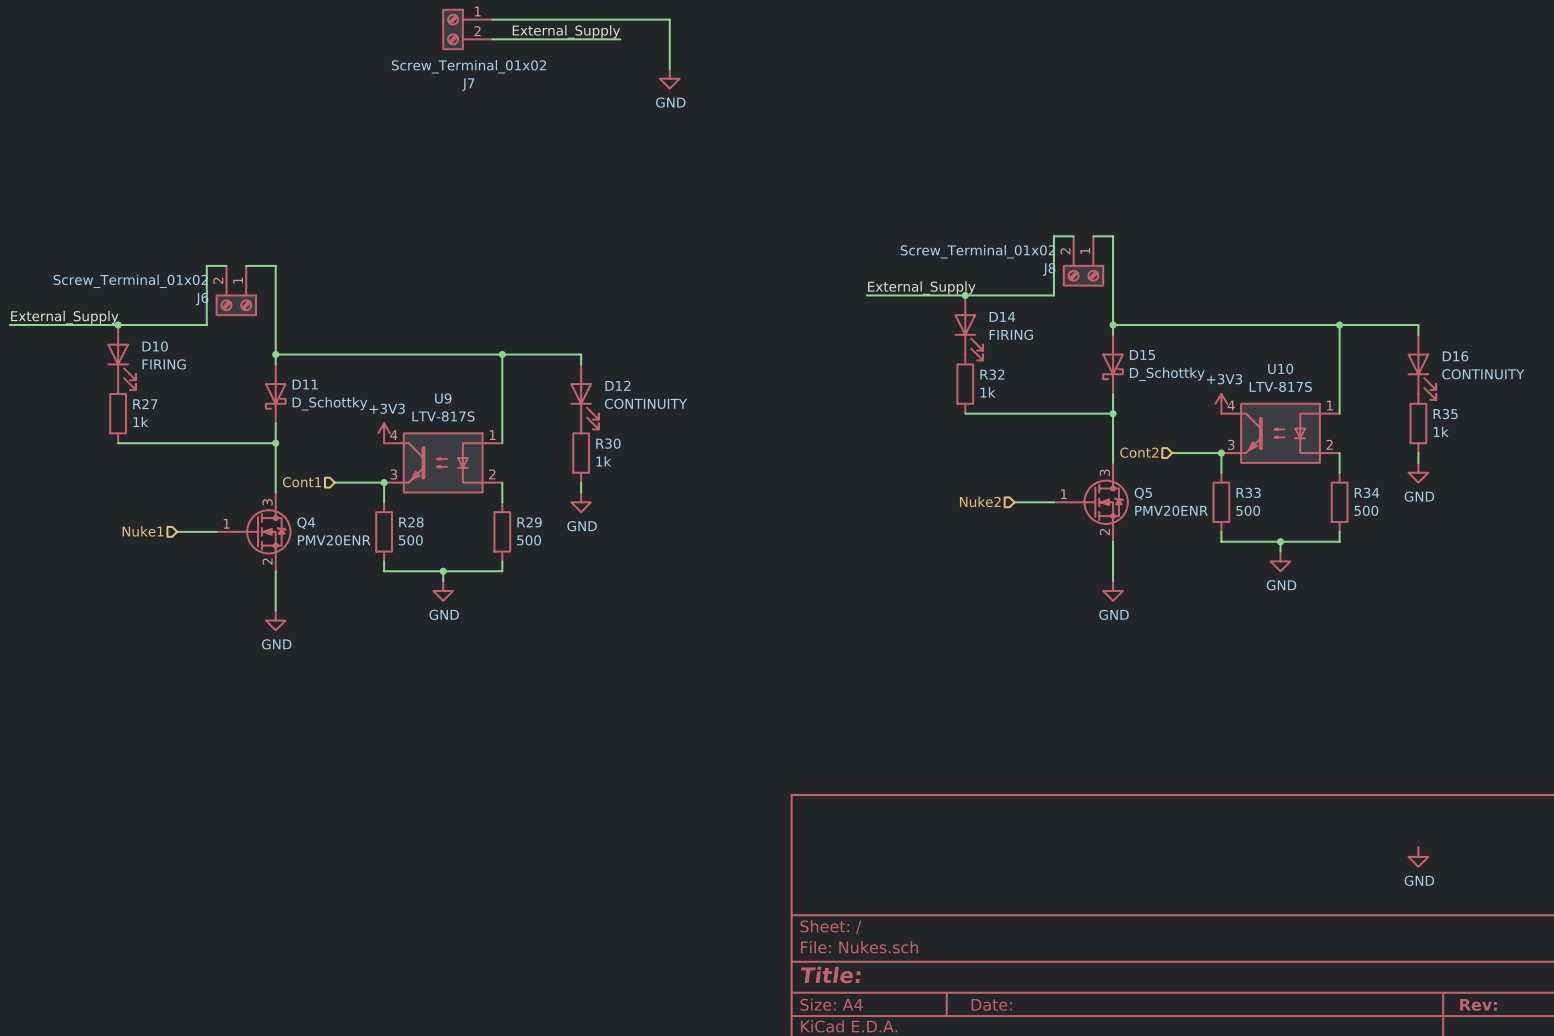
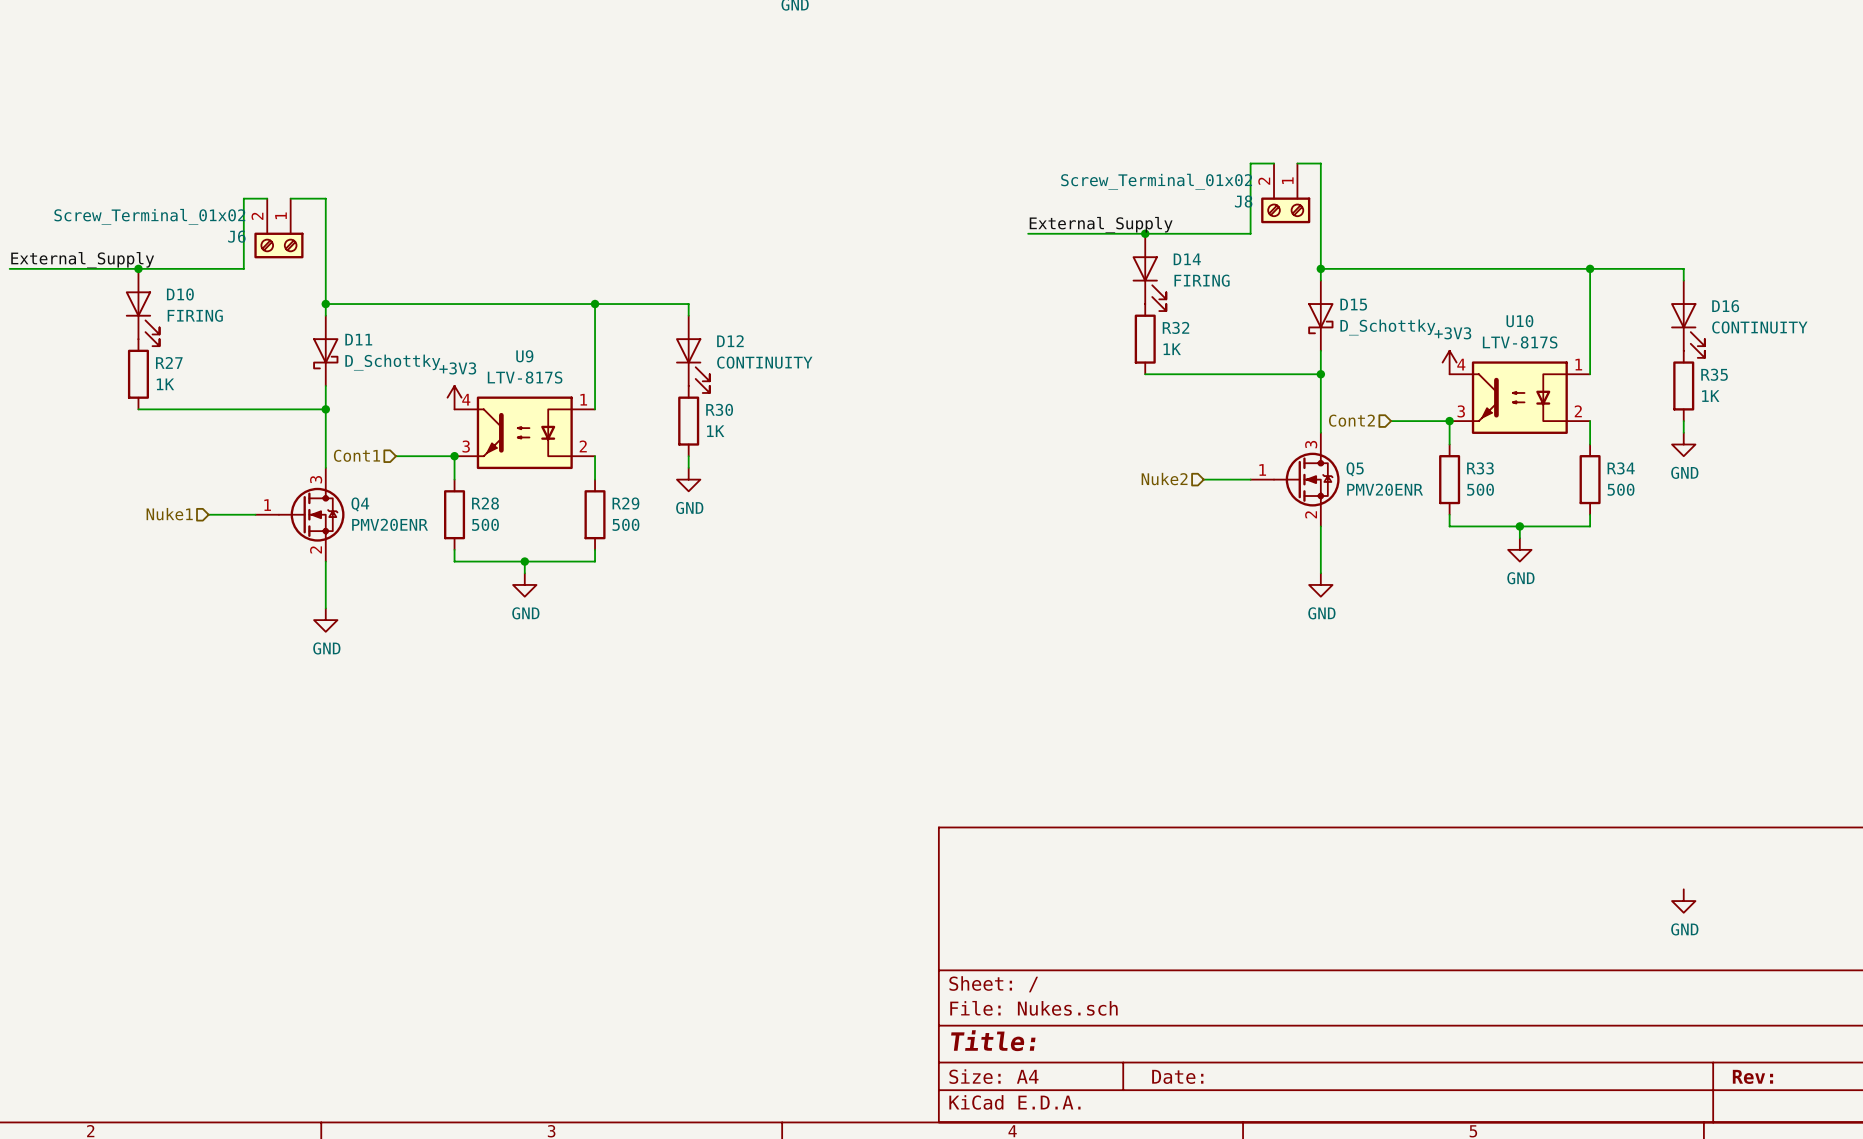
R32 value: 1k (988, 392) -> 1K (1172, 349)
R27 value: 1k (140, 421) -> 1K (165, 384)
R35 value: 1k (1441, 431) -> 1K (1710, 396)
R30 value: 1k (603, 461) -> 1K (715, 431)

